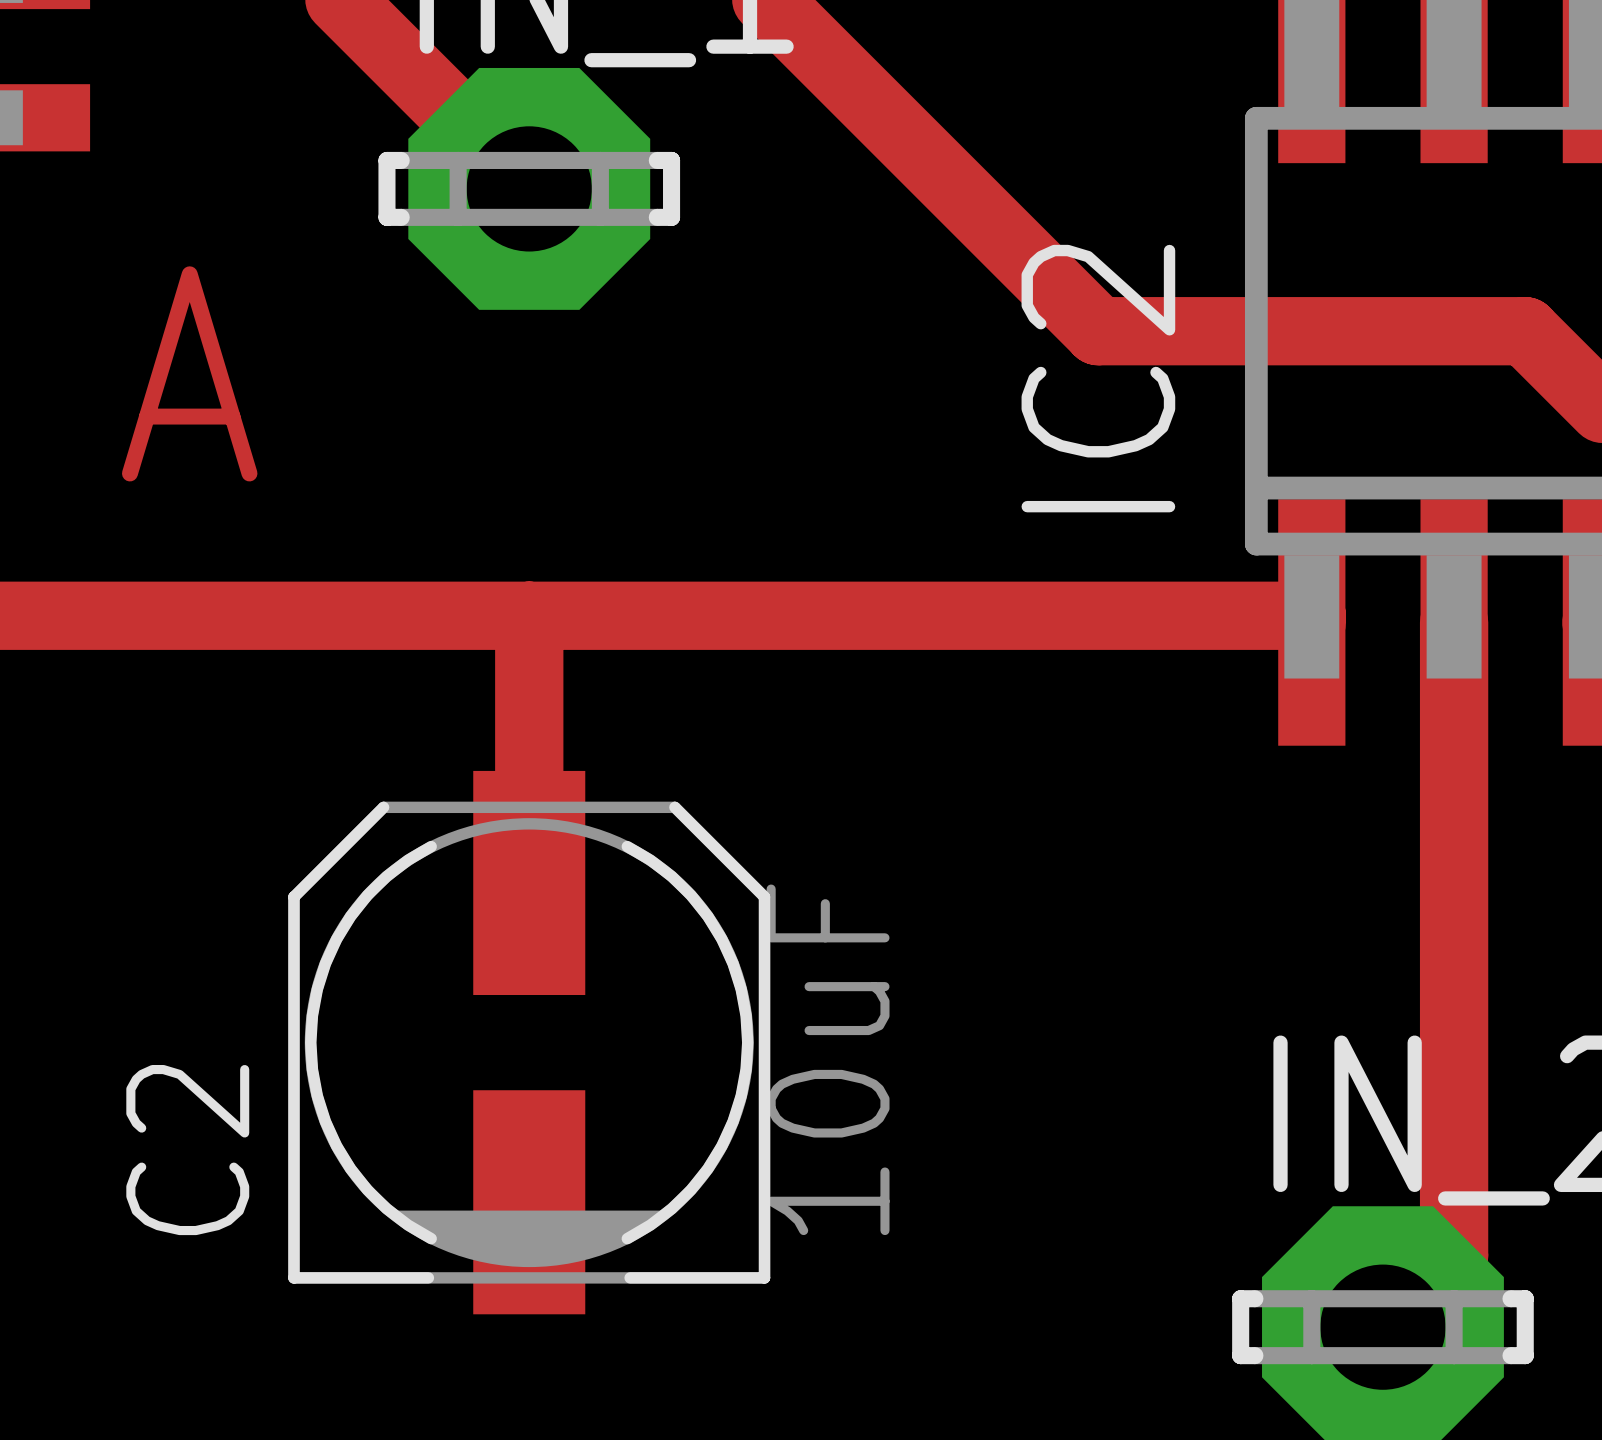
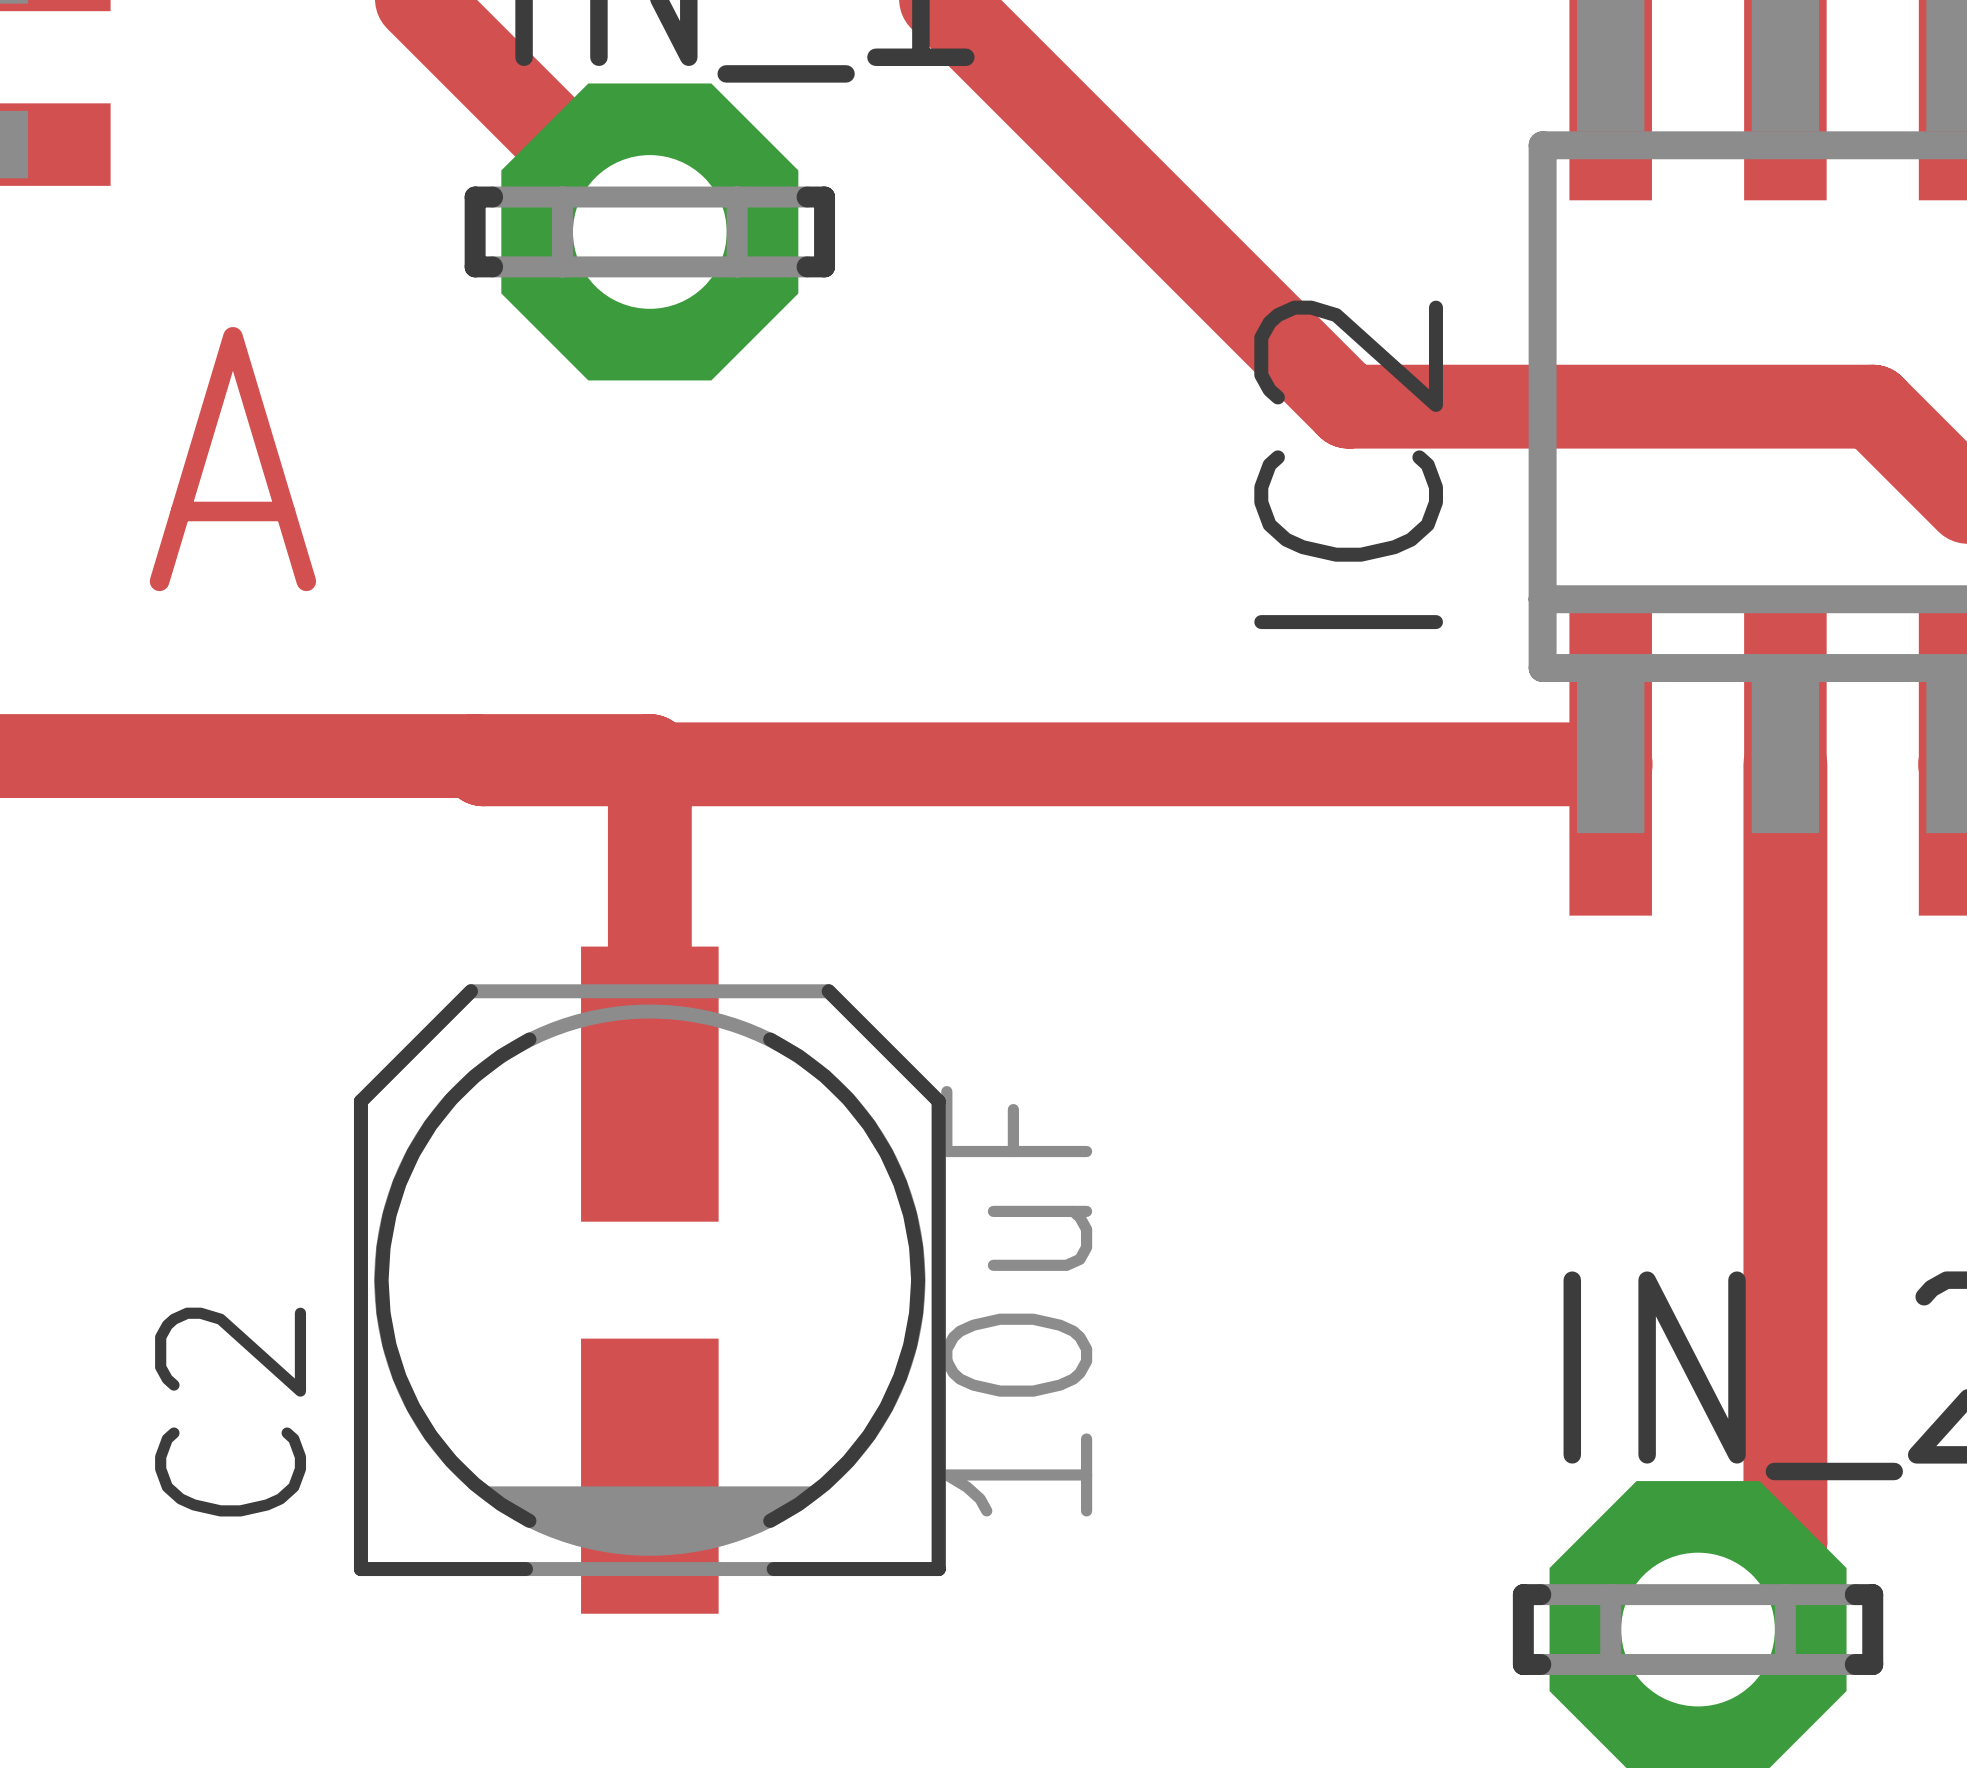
top track: (529, 615) (1311, 615) (1311, 622) -> (475, 756) (483, 764) (1610, 764)

